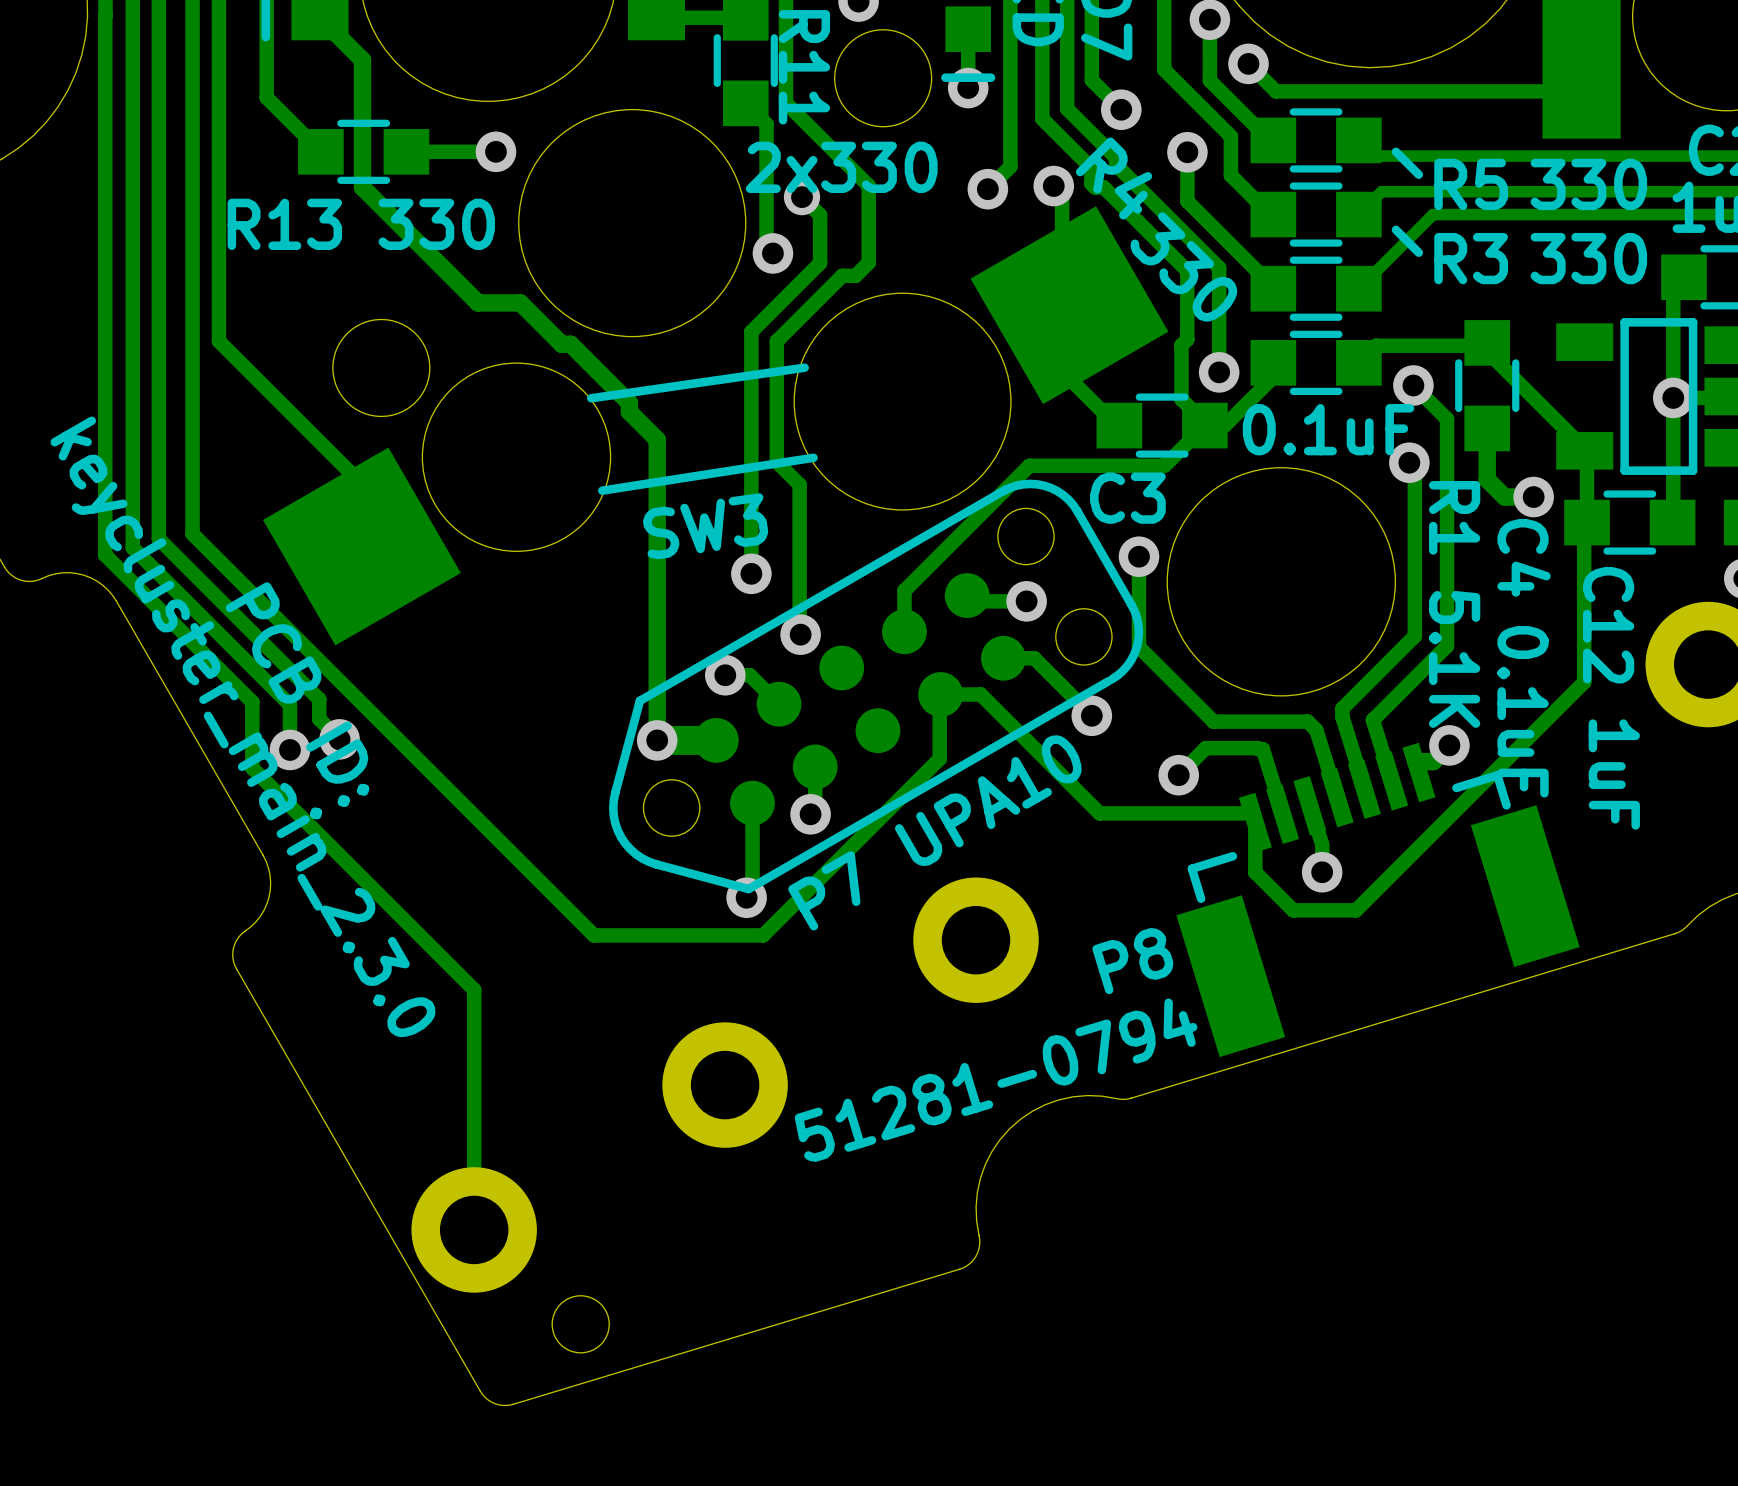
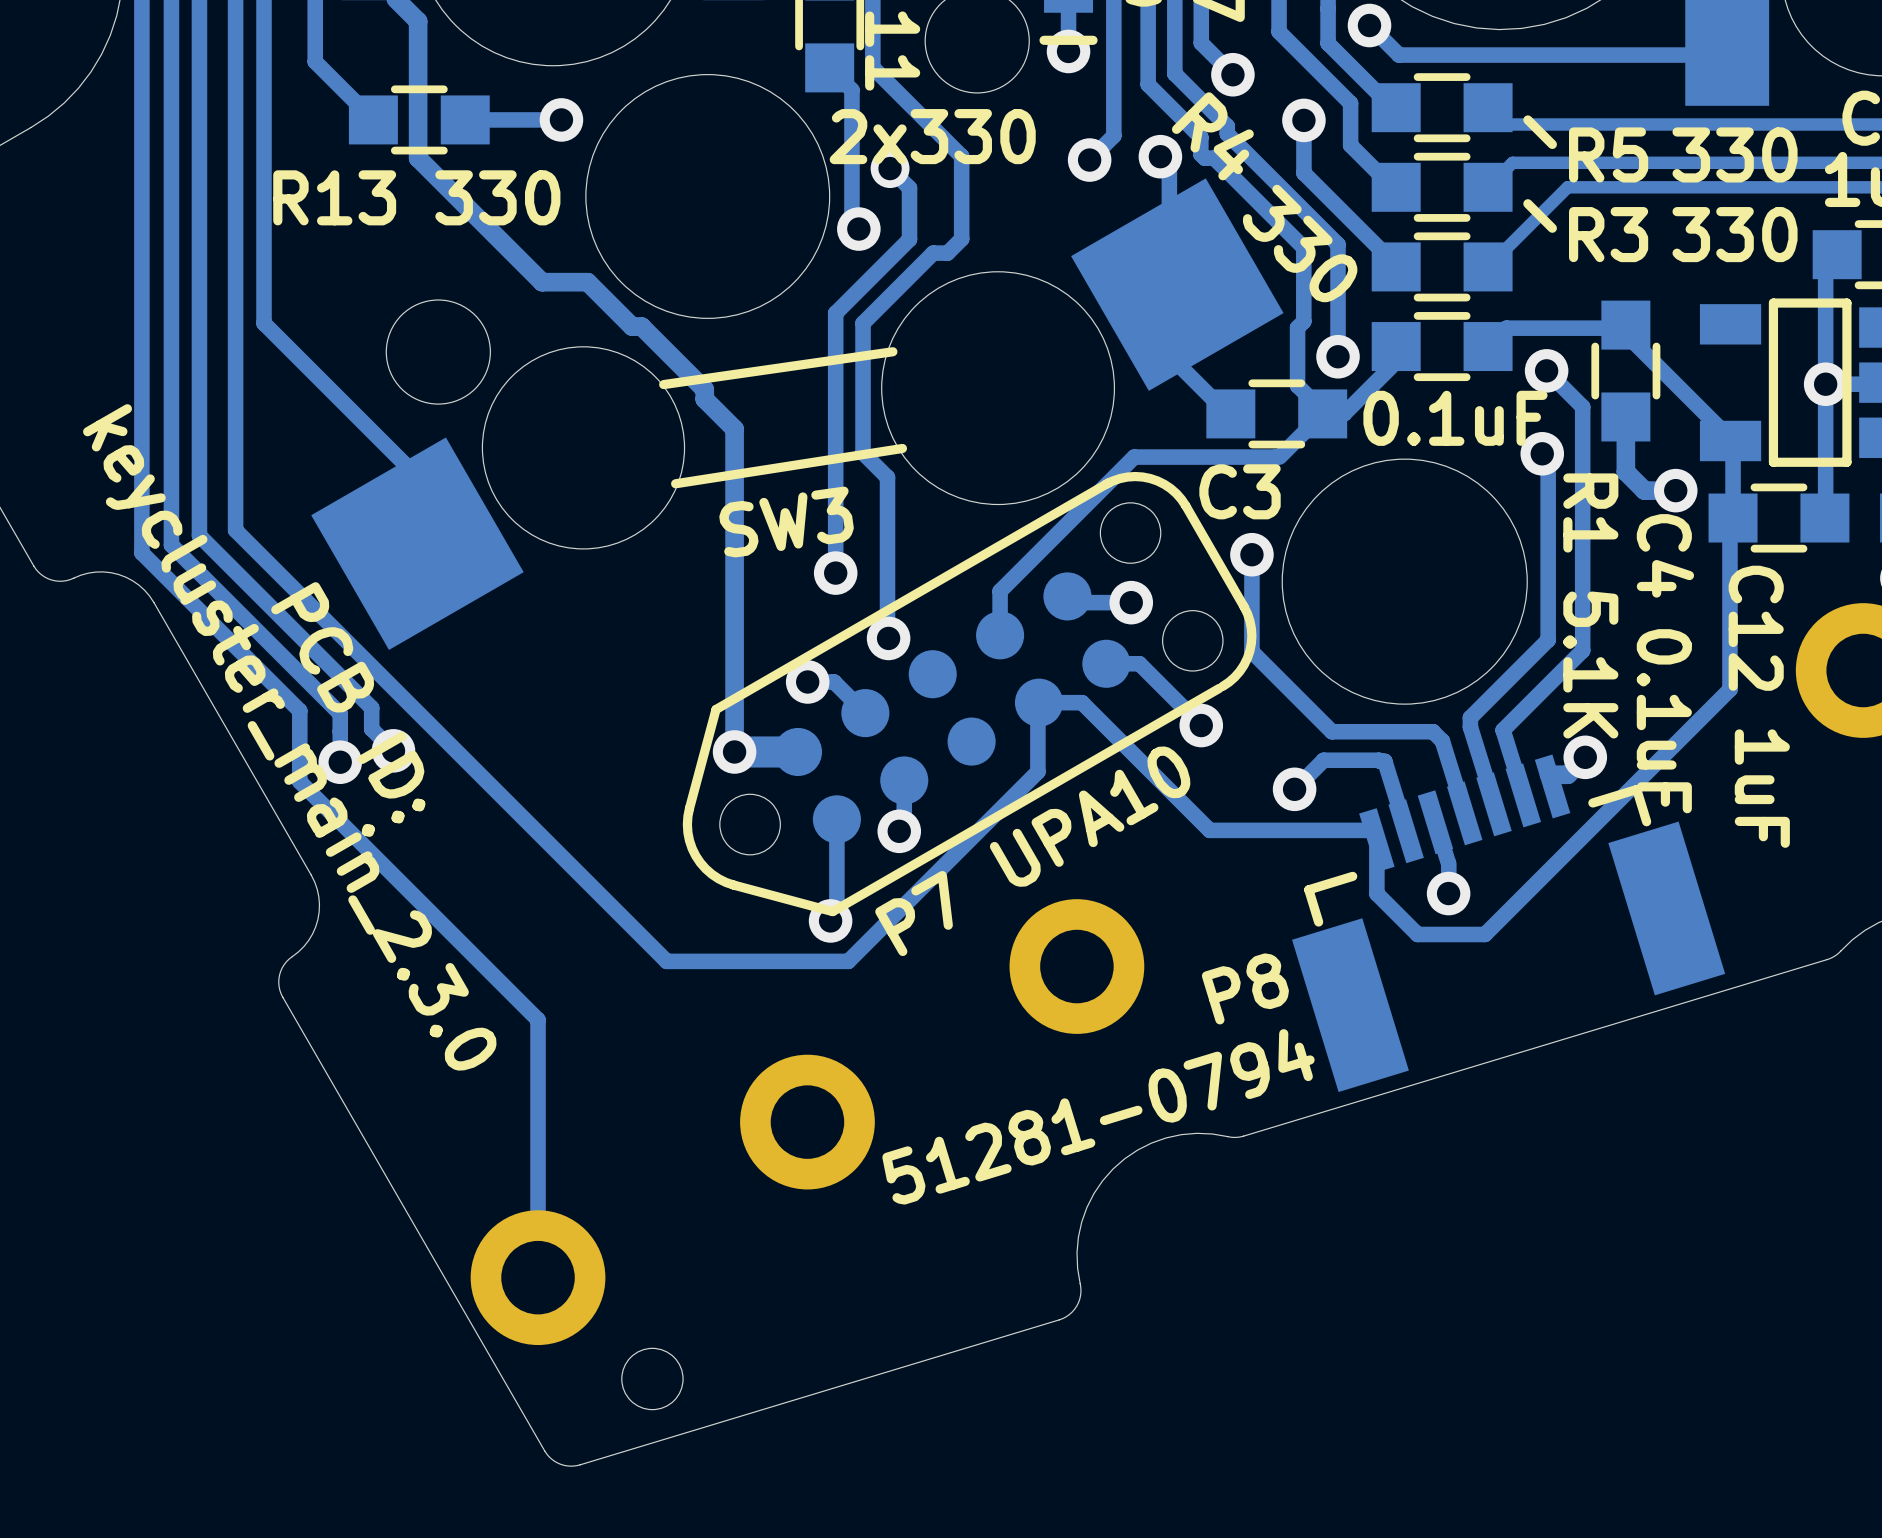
R4 name position: R4 (1114, 178) -> R4 (1212, 136)

